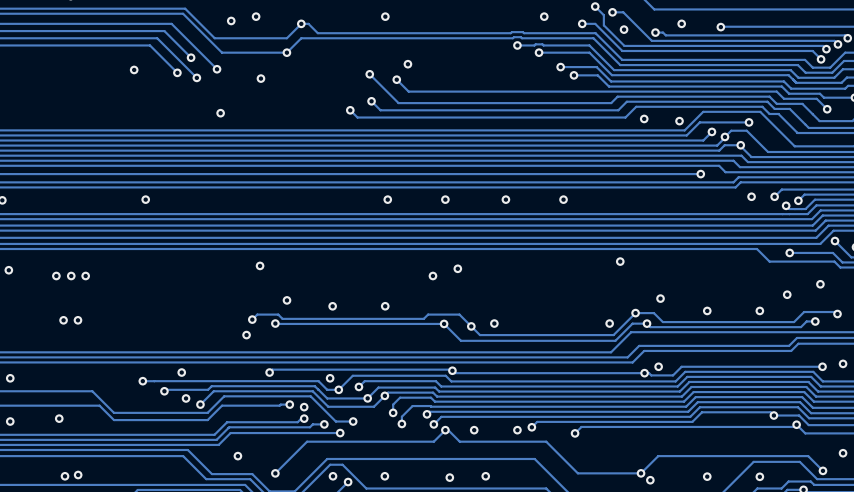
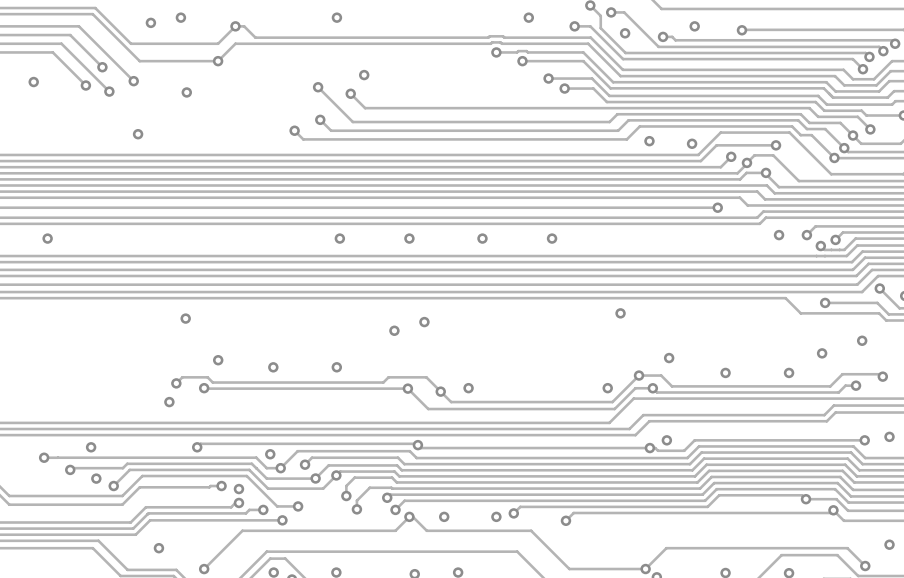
via: none -> (853, 135)
via: none -> (844, 148)
via: none -> (834, 157)

